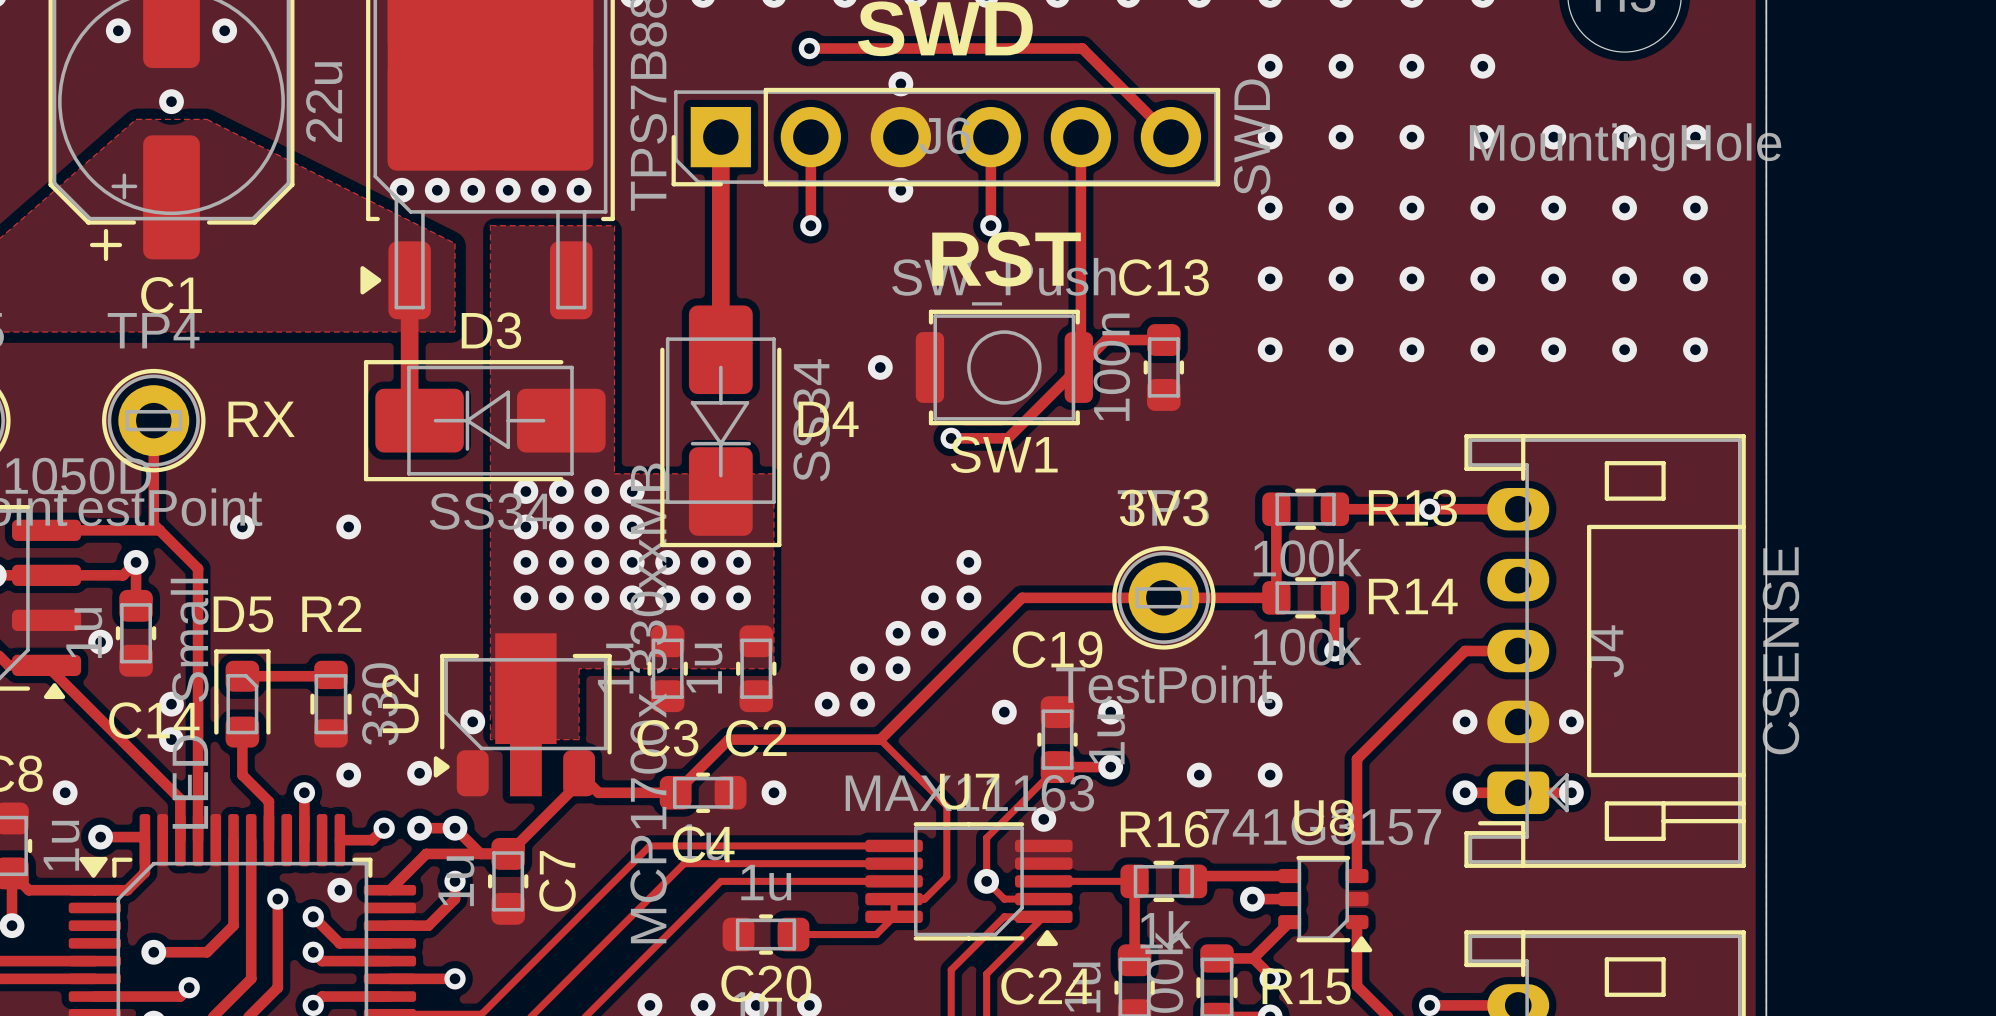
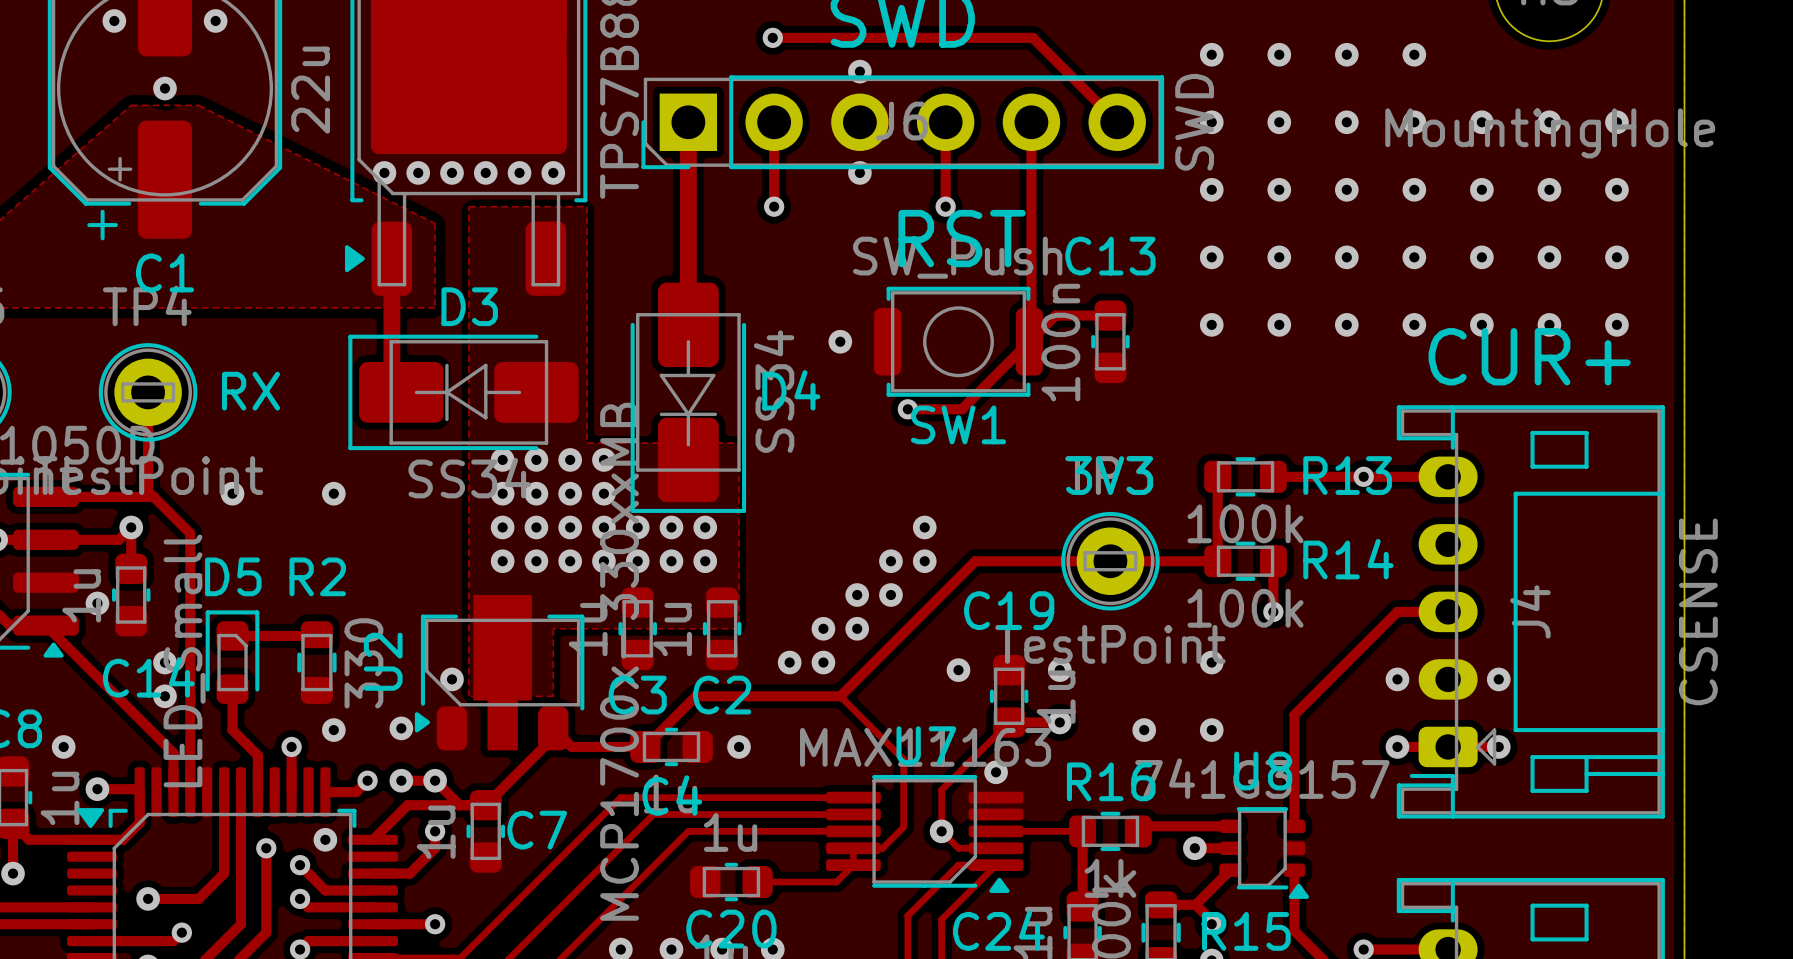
text: none -> CUR+ (1529, 356)
C7 name rotation: 0° (557, 881) -> 90° clockwise (537, 830)

